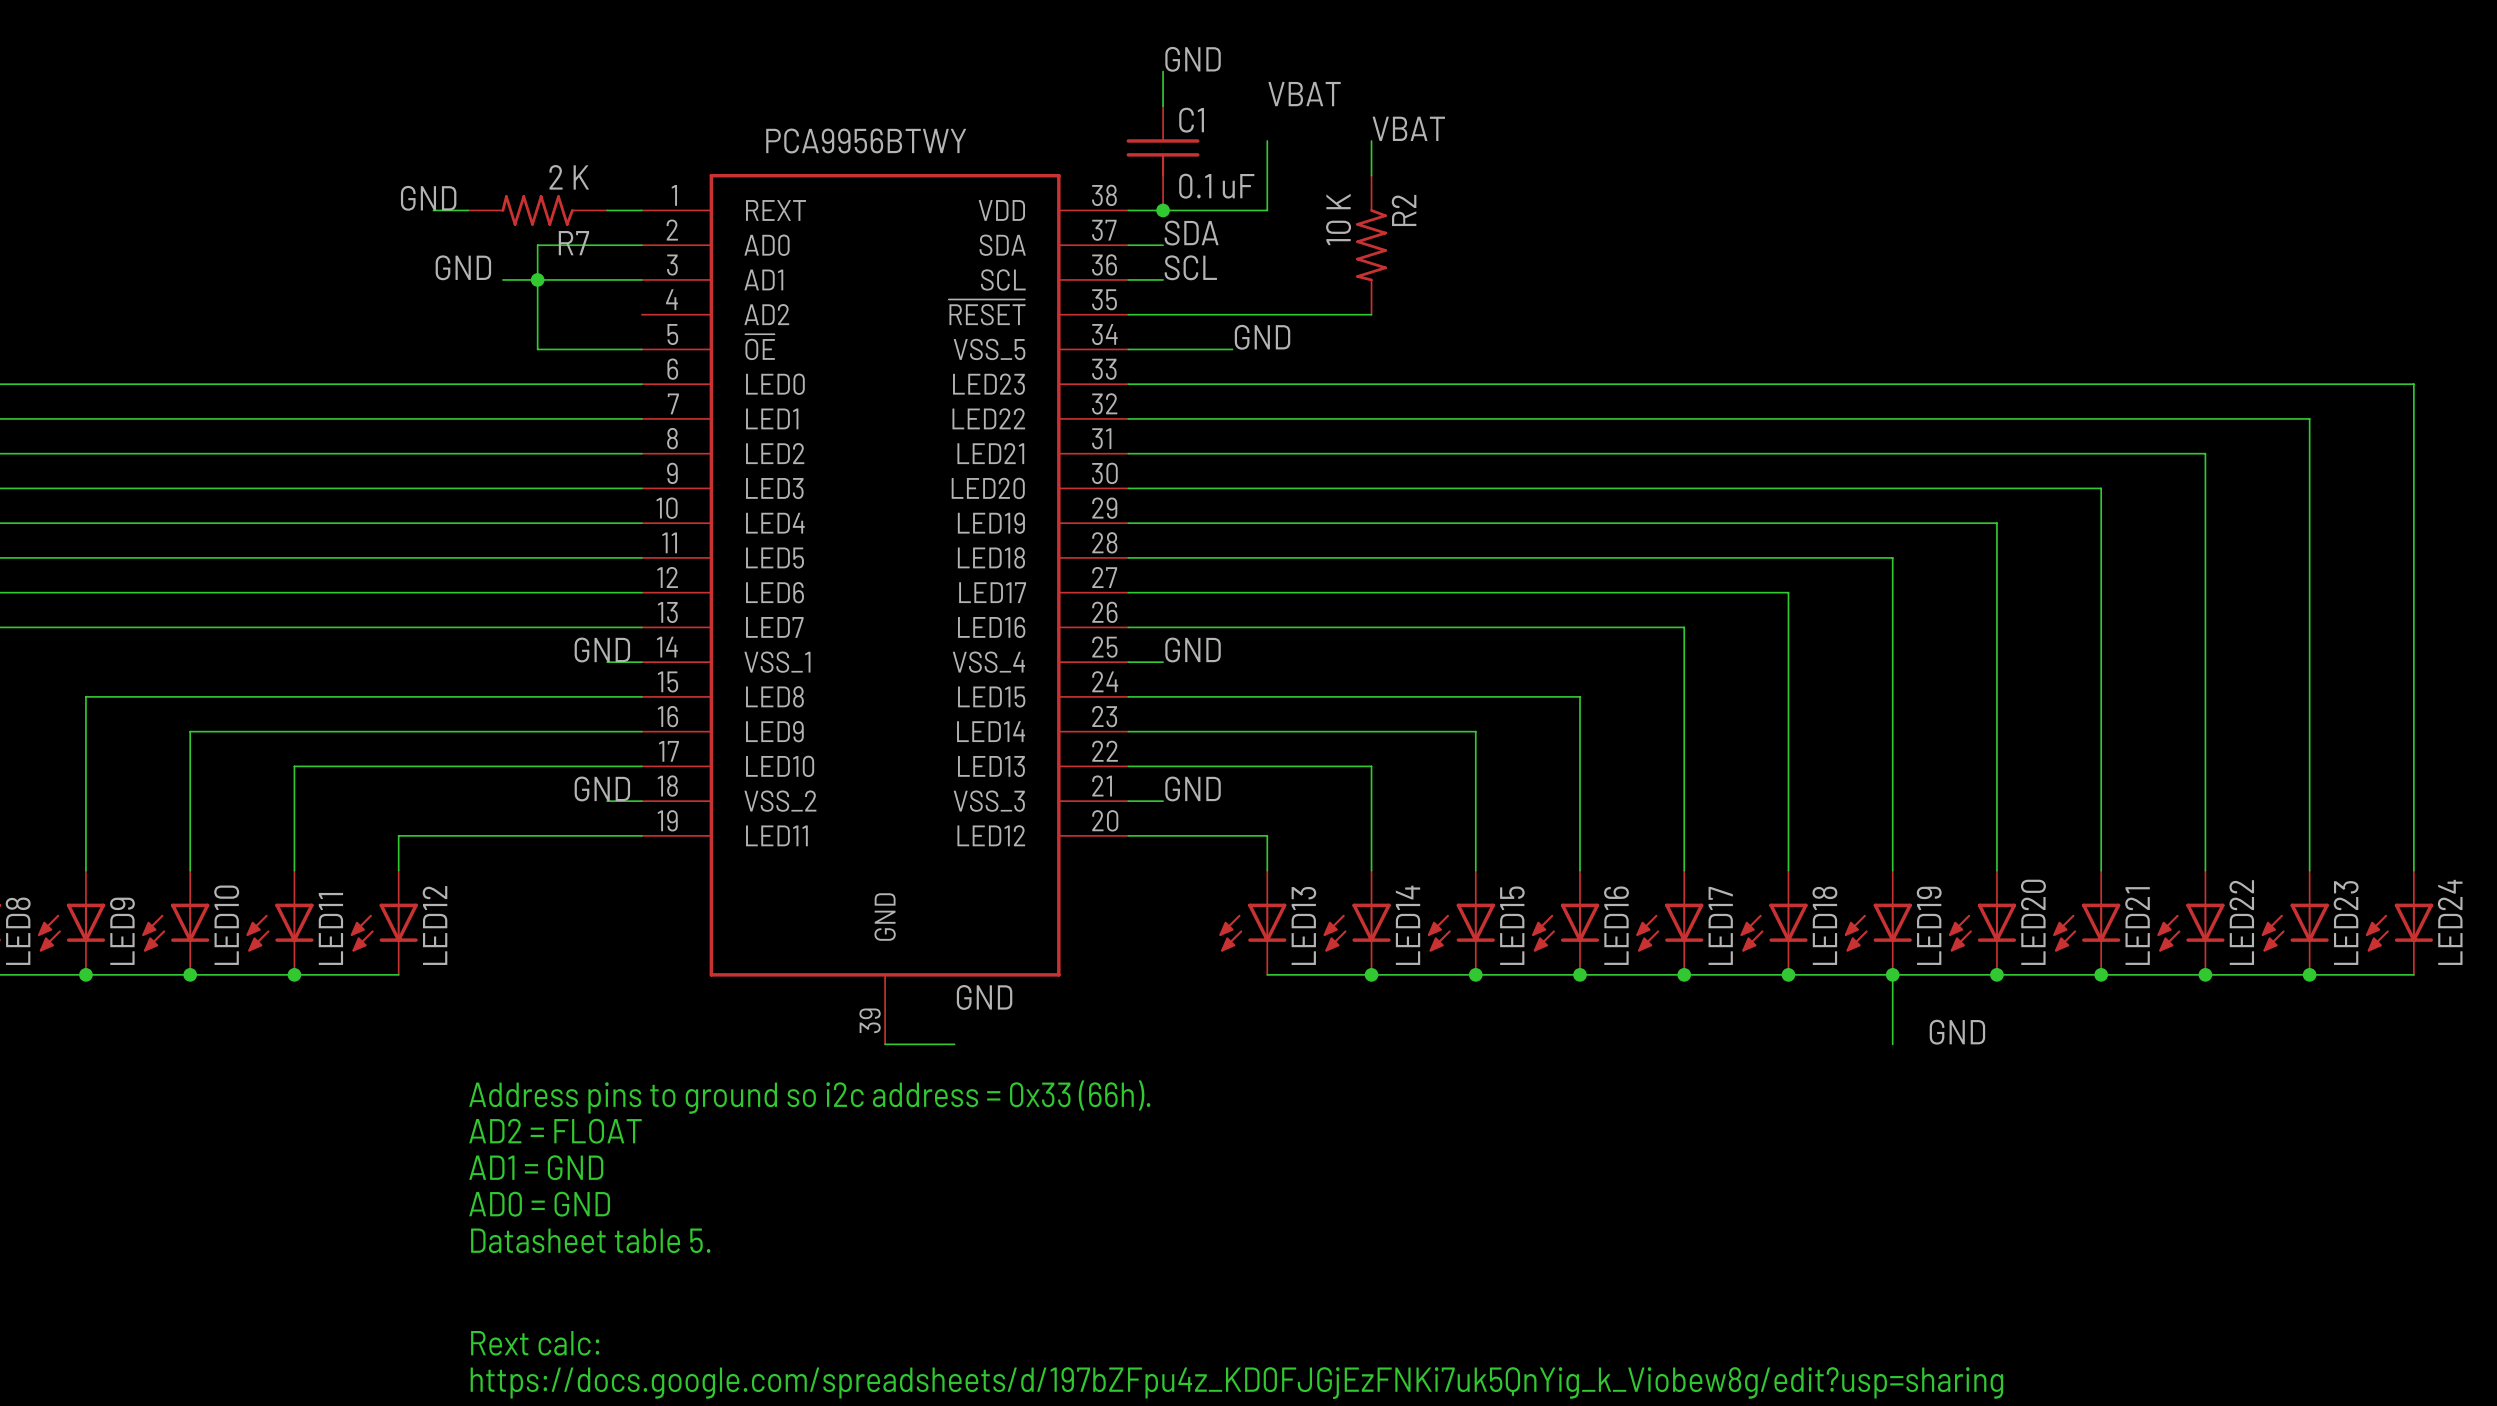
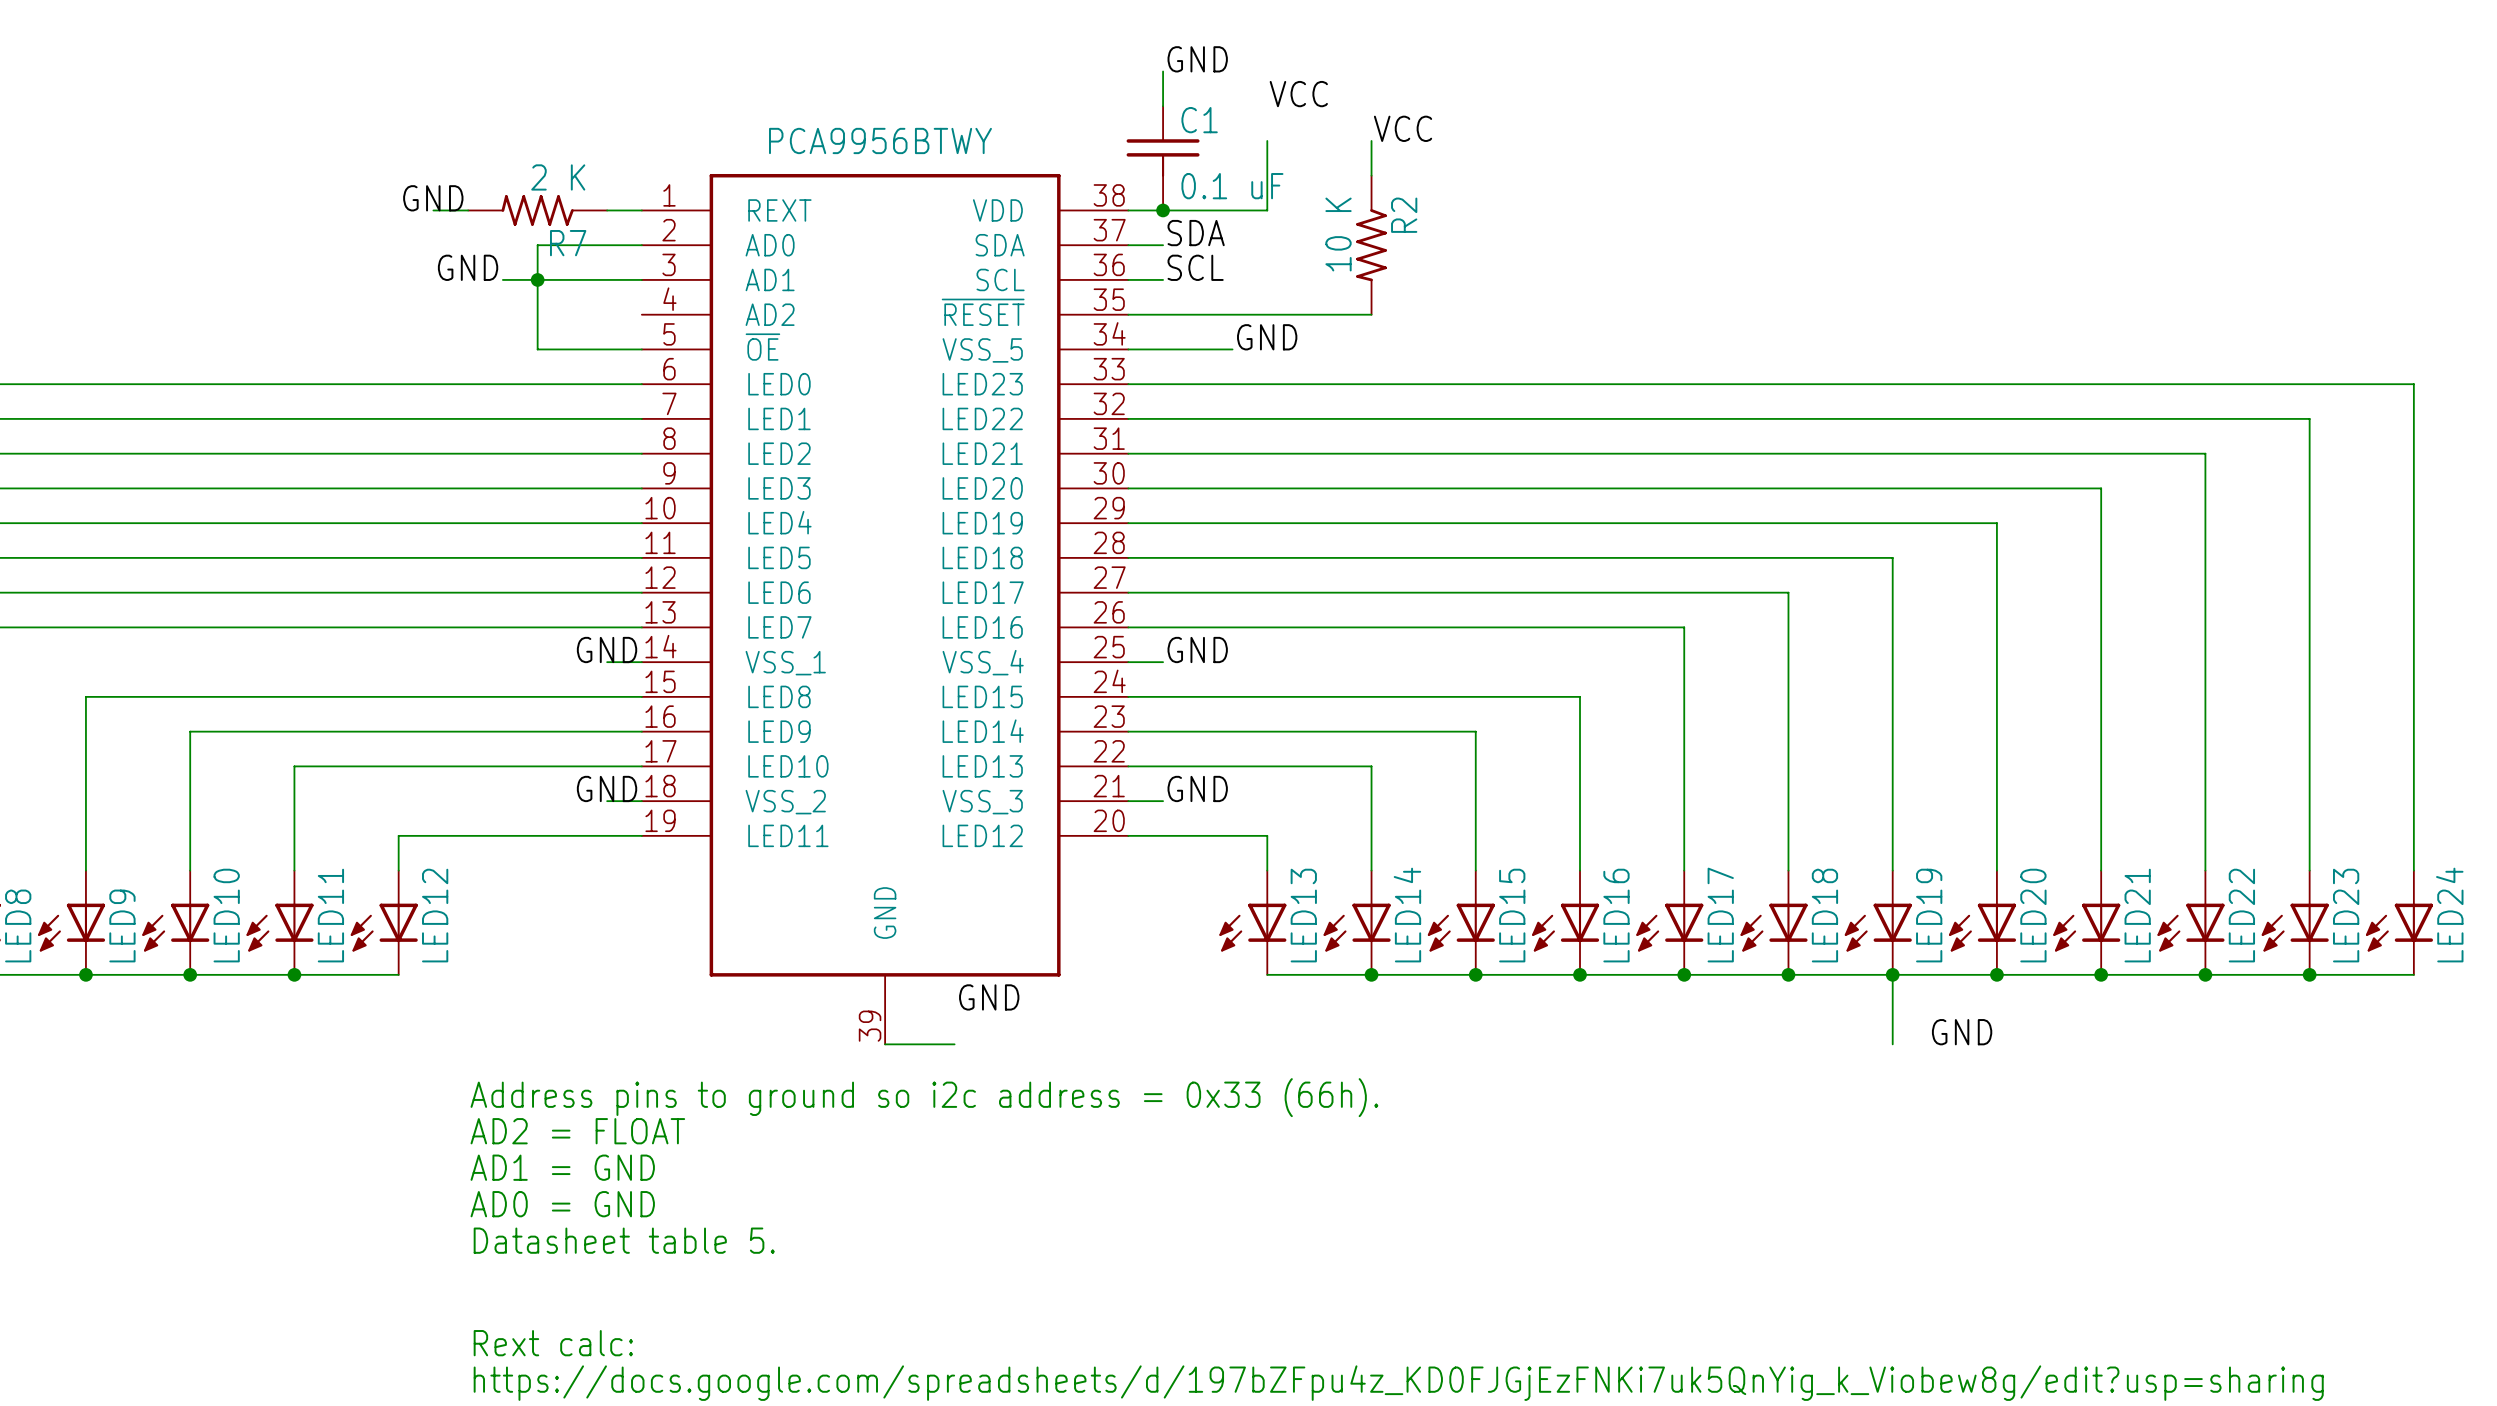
label: VBAT (1304, 94) -> VCC (1298, 94)
label: VBAT (1408, 128) -> VCC (1403, 128)

